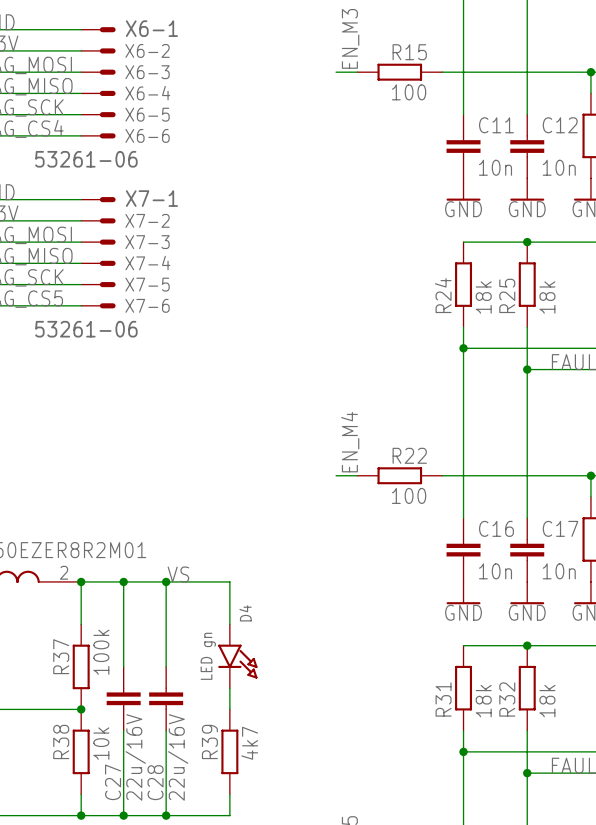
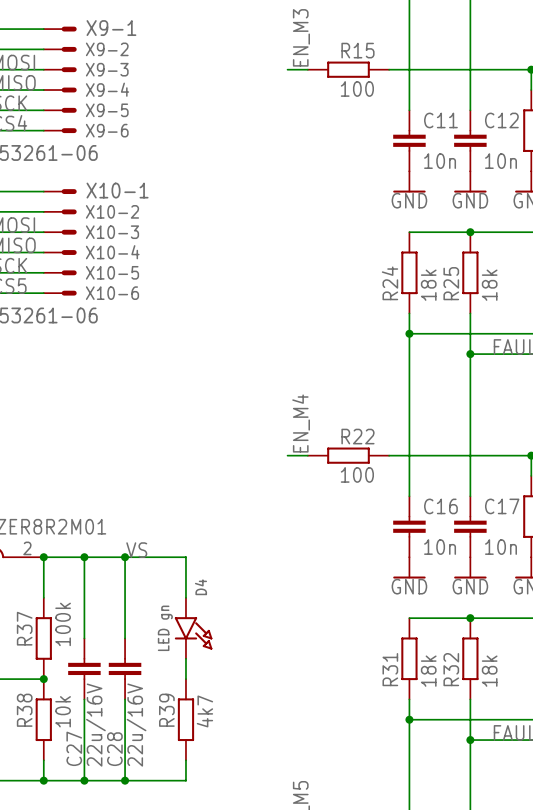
X6-1 name: X6-1 (151, 28) -> X9-1 (111, 28)
X6-2 name: X6-2 (147, 50) -> X9-2 (107, 49)
X6-3 name: X6-3 (147, 72) -> X9-3 (107, 69)
X6-4 name: X6-4 (147, 93) -> X9-4 (107, 89)
X6-5 name: X6-5 (147, 114) -> X9-5 (107, 110)
X6-6 name: X6-6 (147, 135) -> X9-6 (107, 130)
X7-1 name: X7-1 (151, 198) -> X10-1 (117, 190)
X7-2 name: X7-2 (147, 220) -> X10-2 (112, 211)
X7-3 name: X7-3 (147, 242) -> X10-3 (112, 232)
X7-4 name: X7-4 (147, 263) -> X10-4 (112, 252)
X7-5 name: X7-5 (147, 284) -> X10-5 (112, 272)
X7-6 name: X7-6 (147, 305) -> X10-6 (112, 293)

